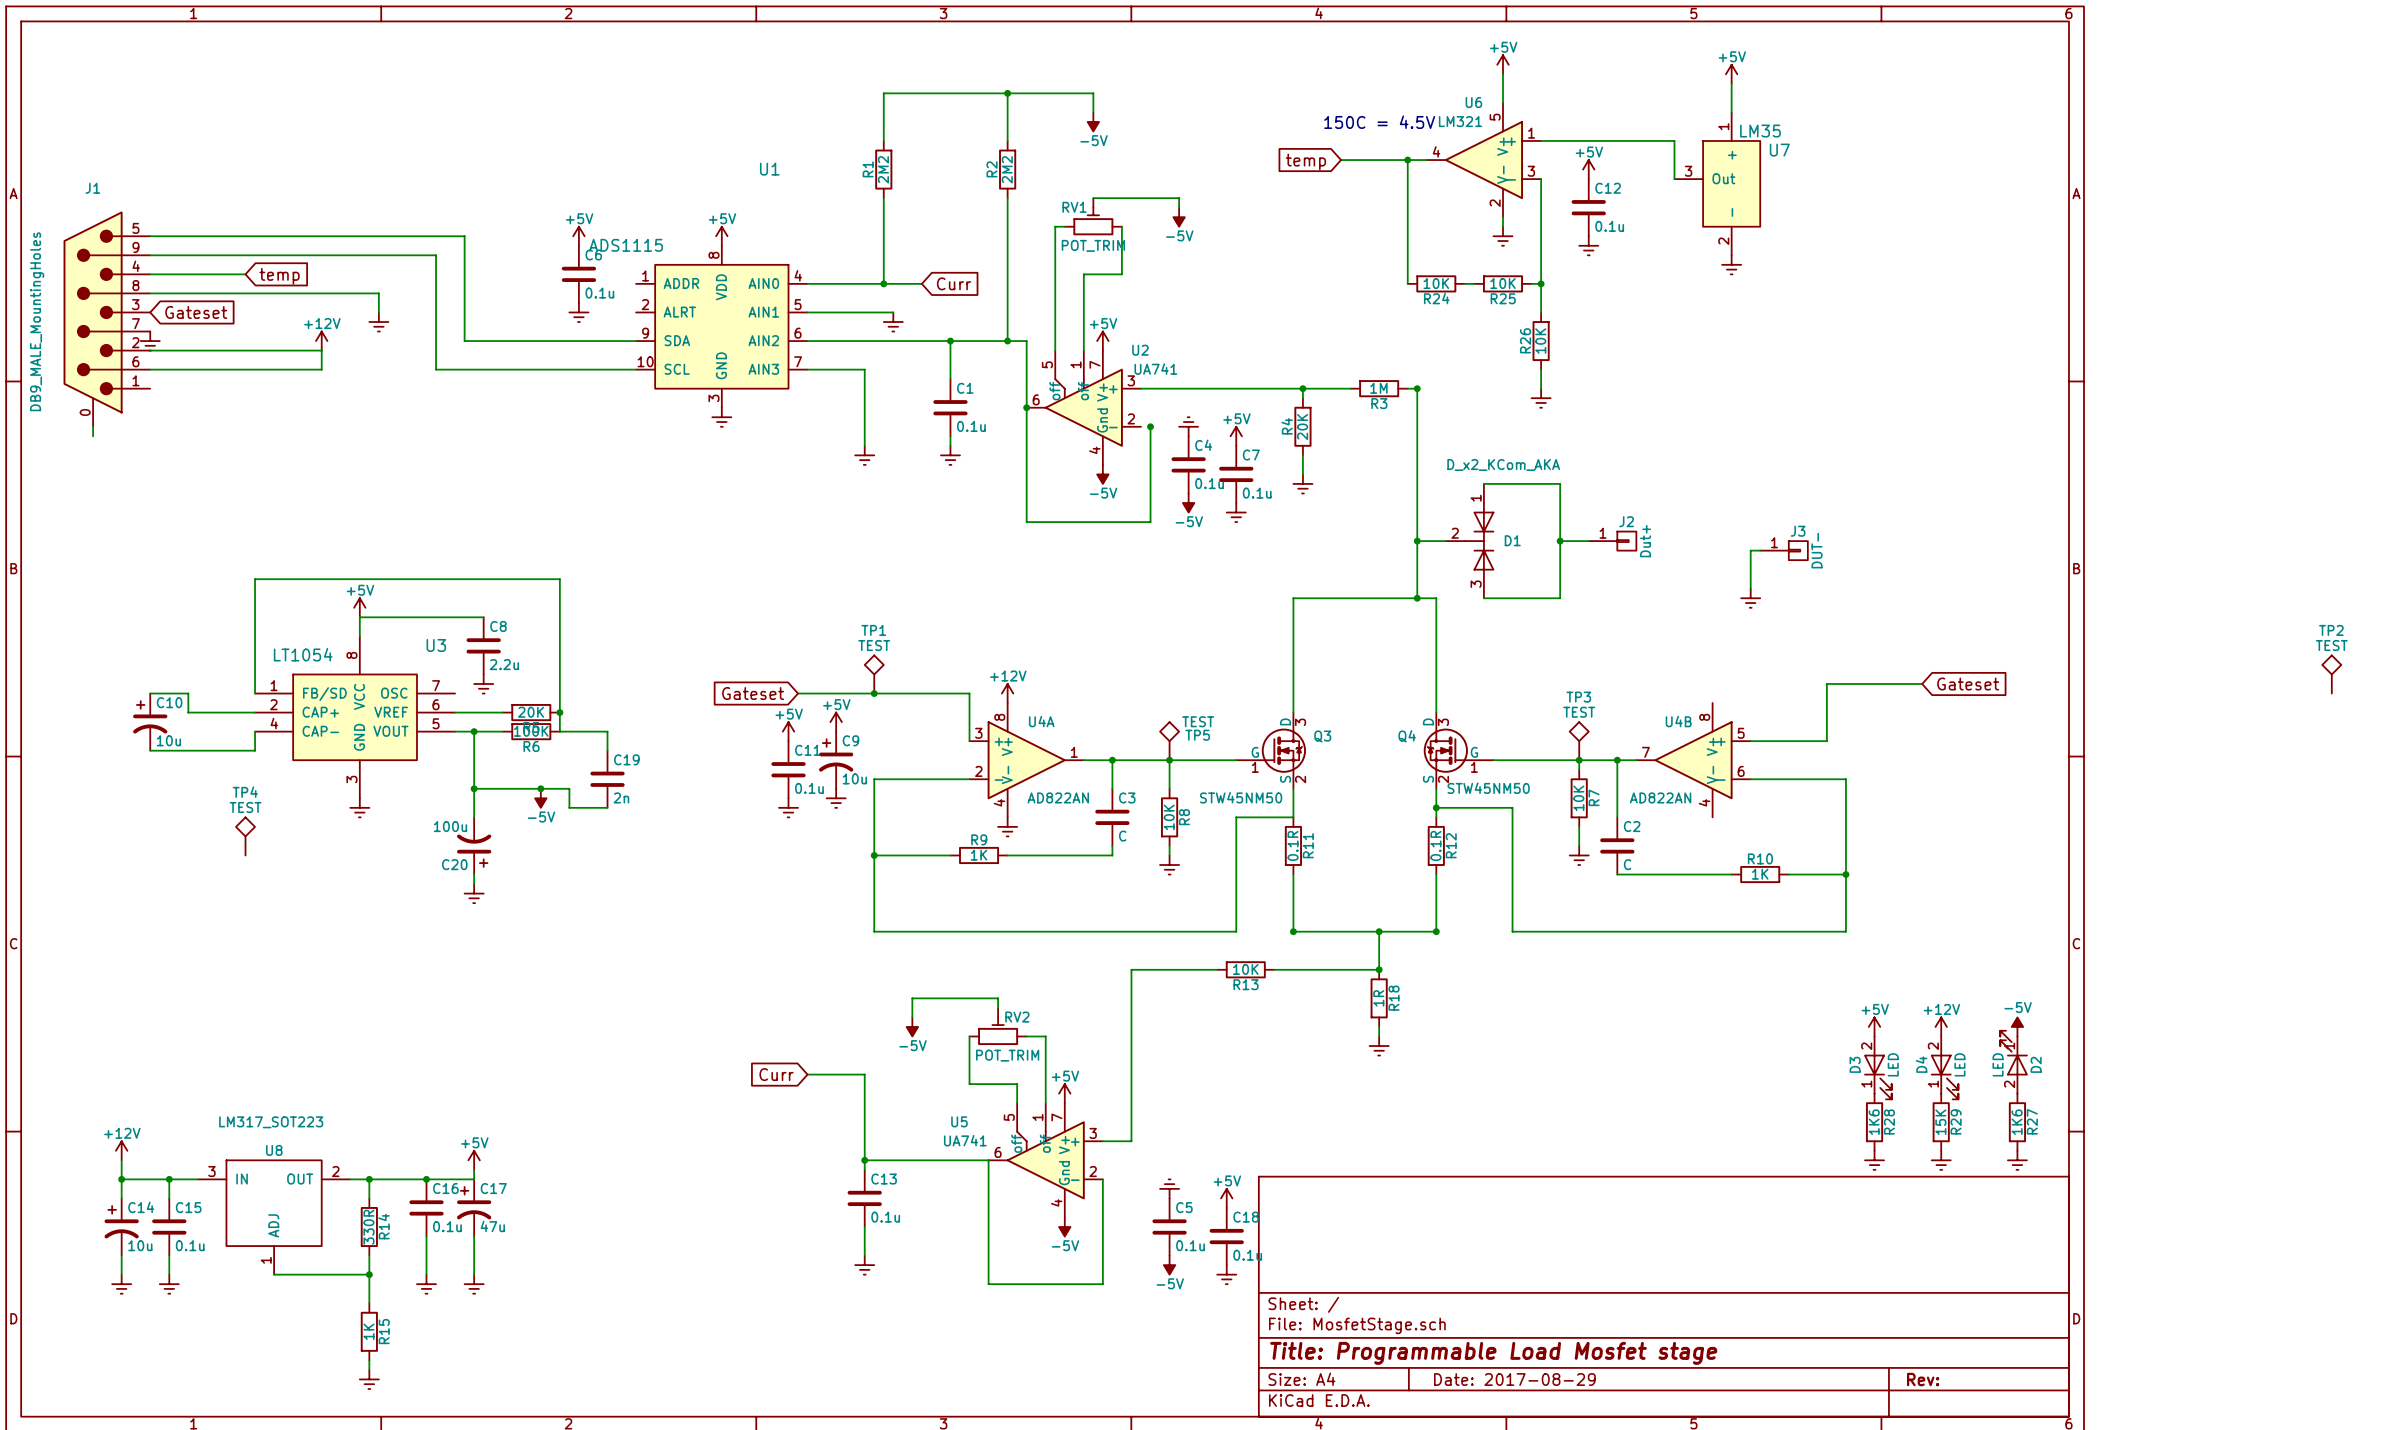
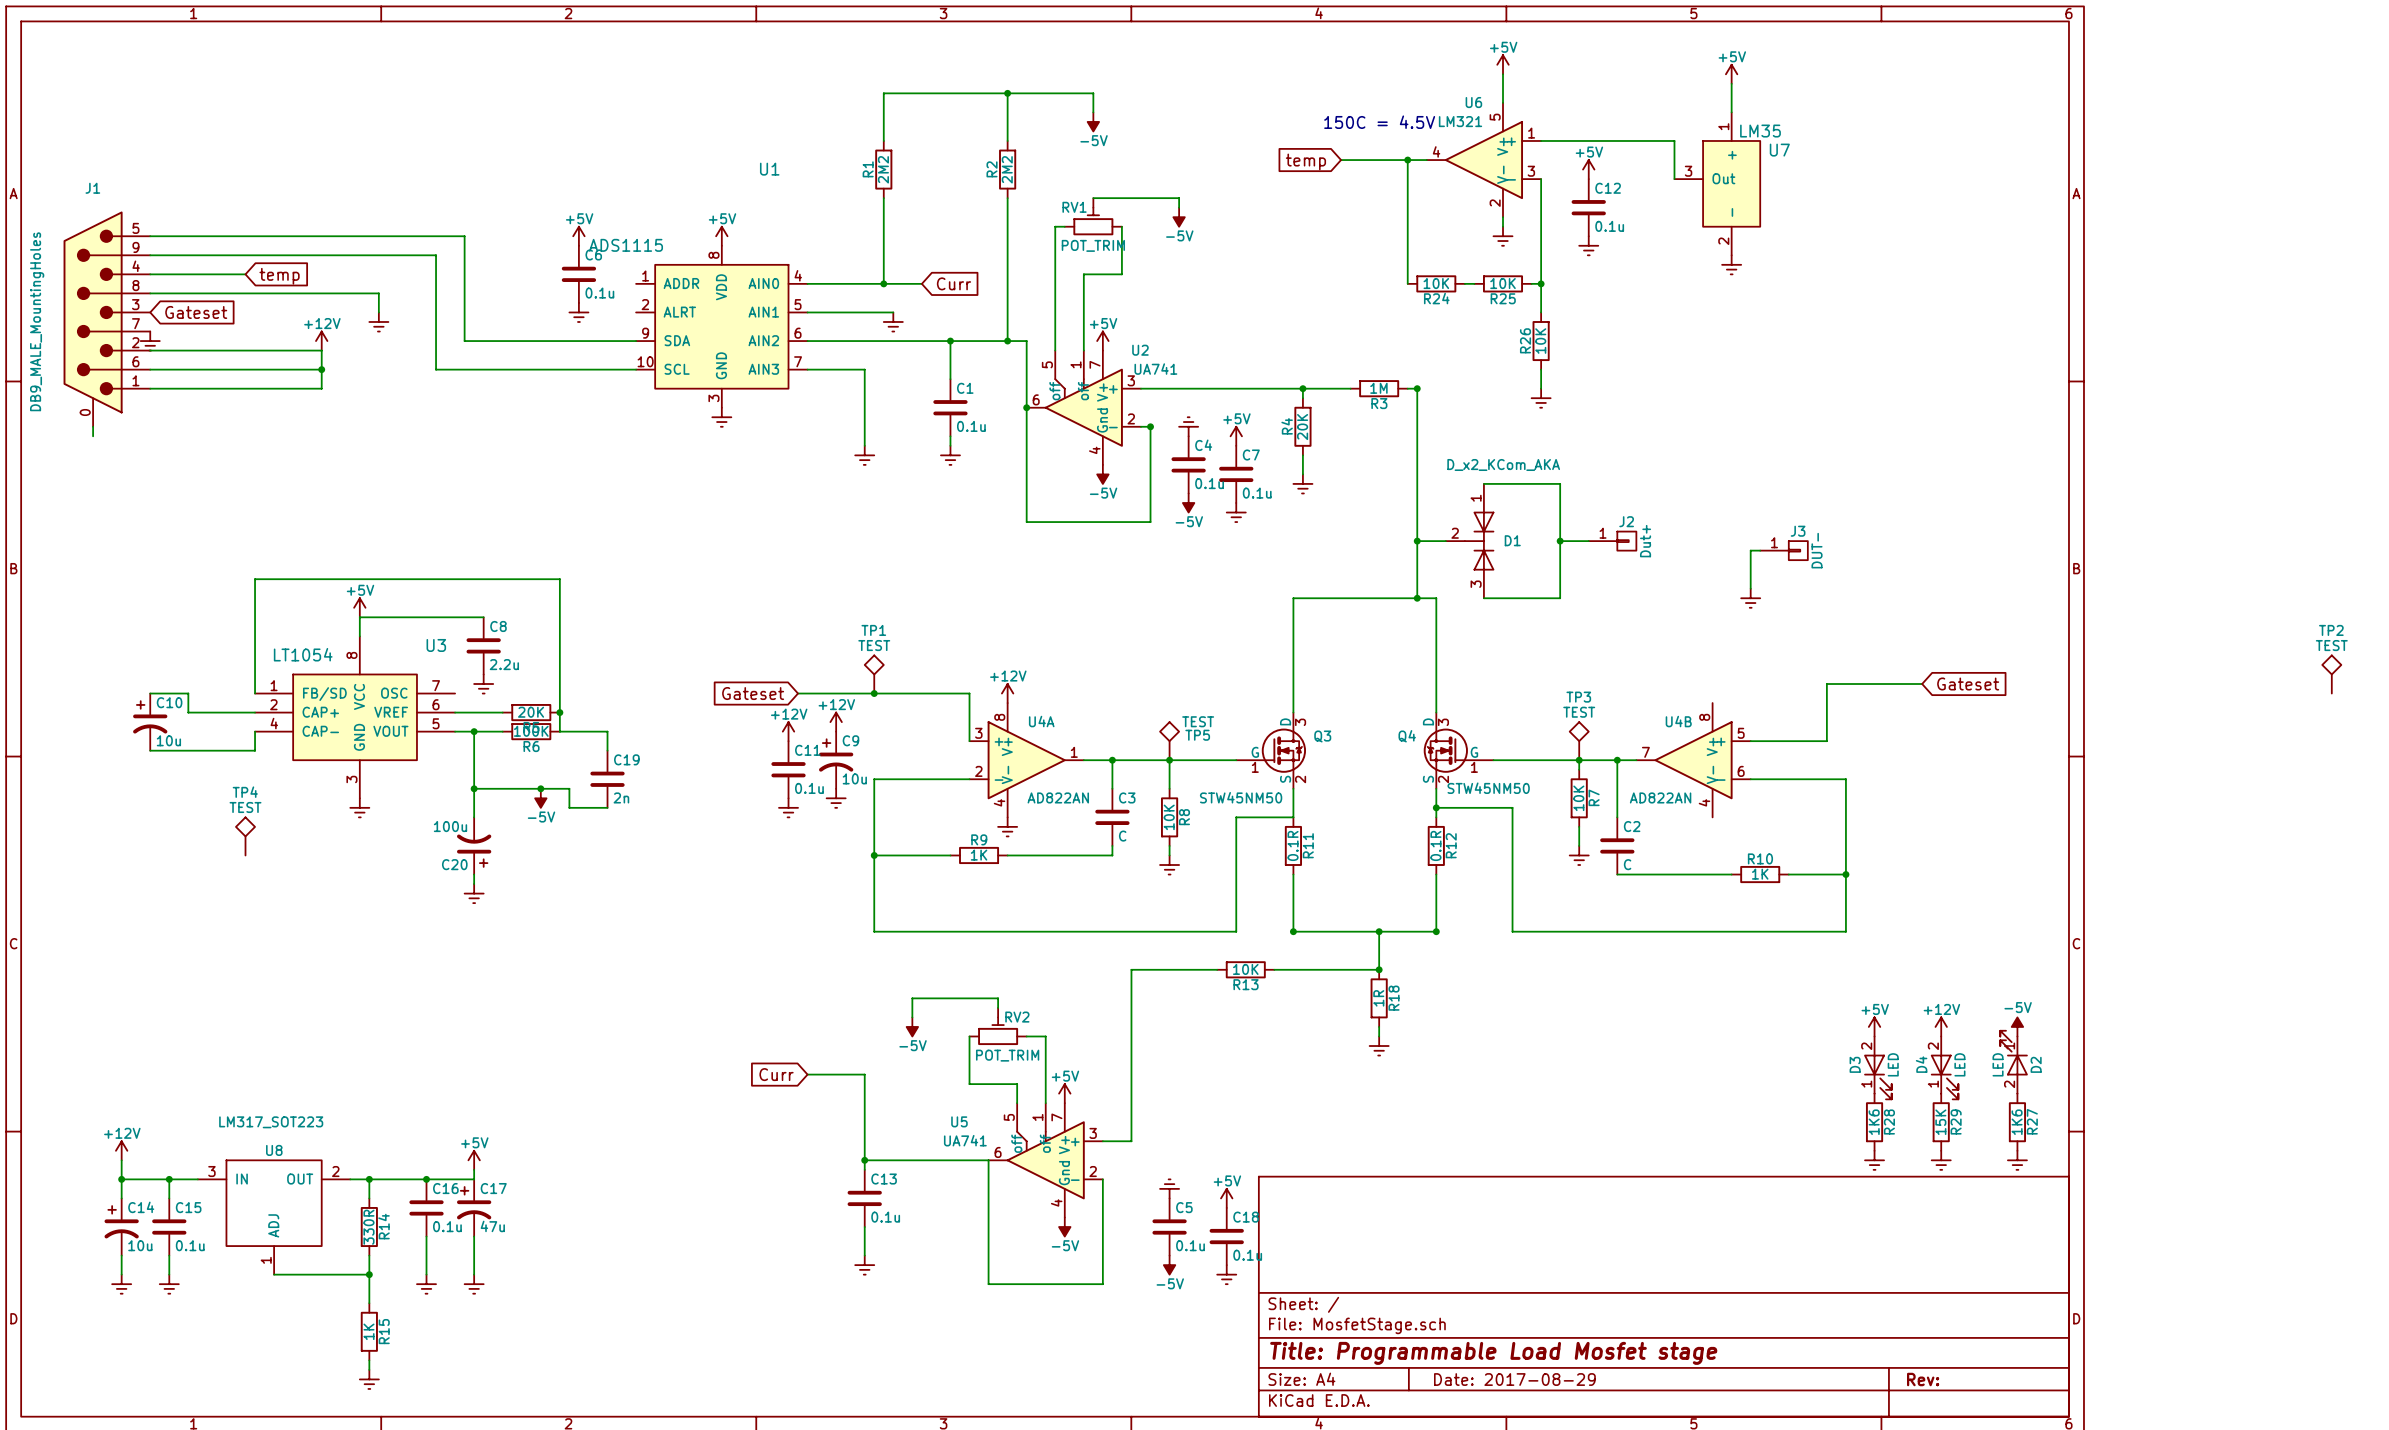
wire: none -> (321, 369) (321, 388) (150, 388)
junction: none -> (321, 369)
wire: none -> (1140, 426) (1150, 426)
power symbol: +5V (836, 722) -> +12V (836, 722)
power symbol: +5V (788, 731) -> +12V (788, 731)

